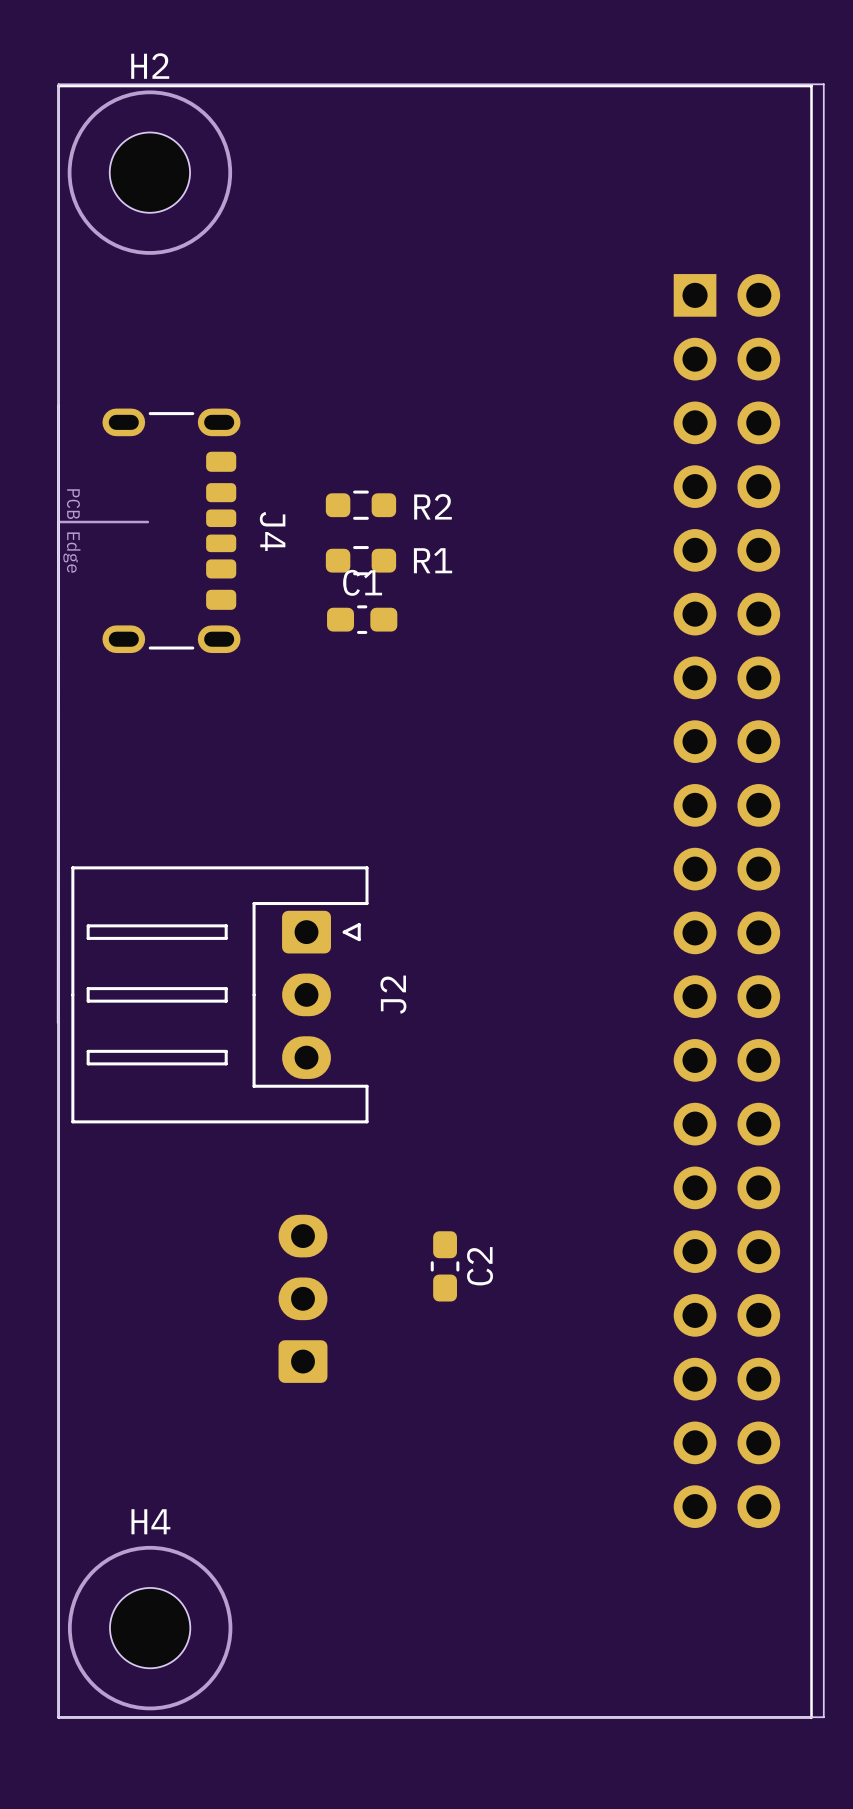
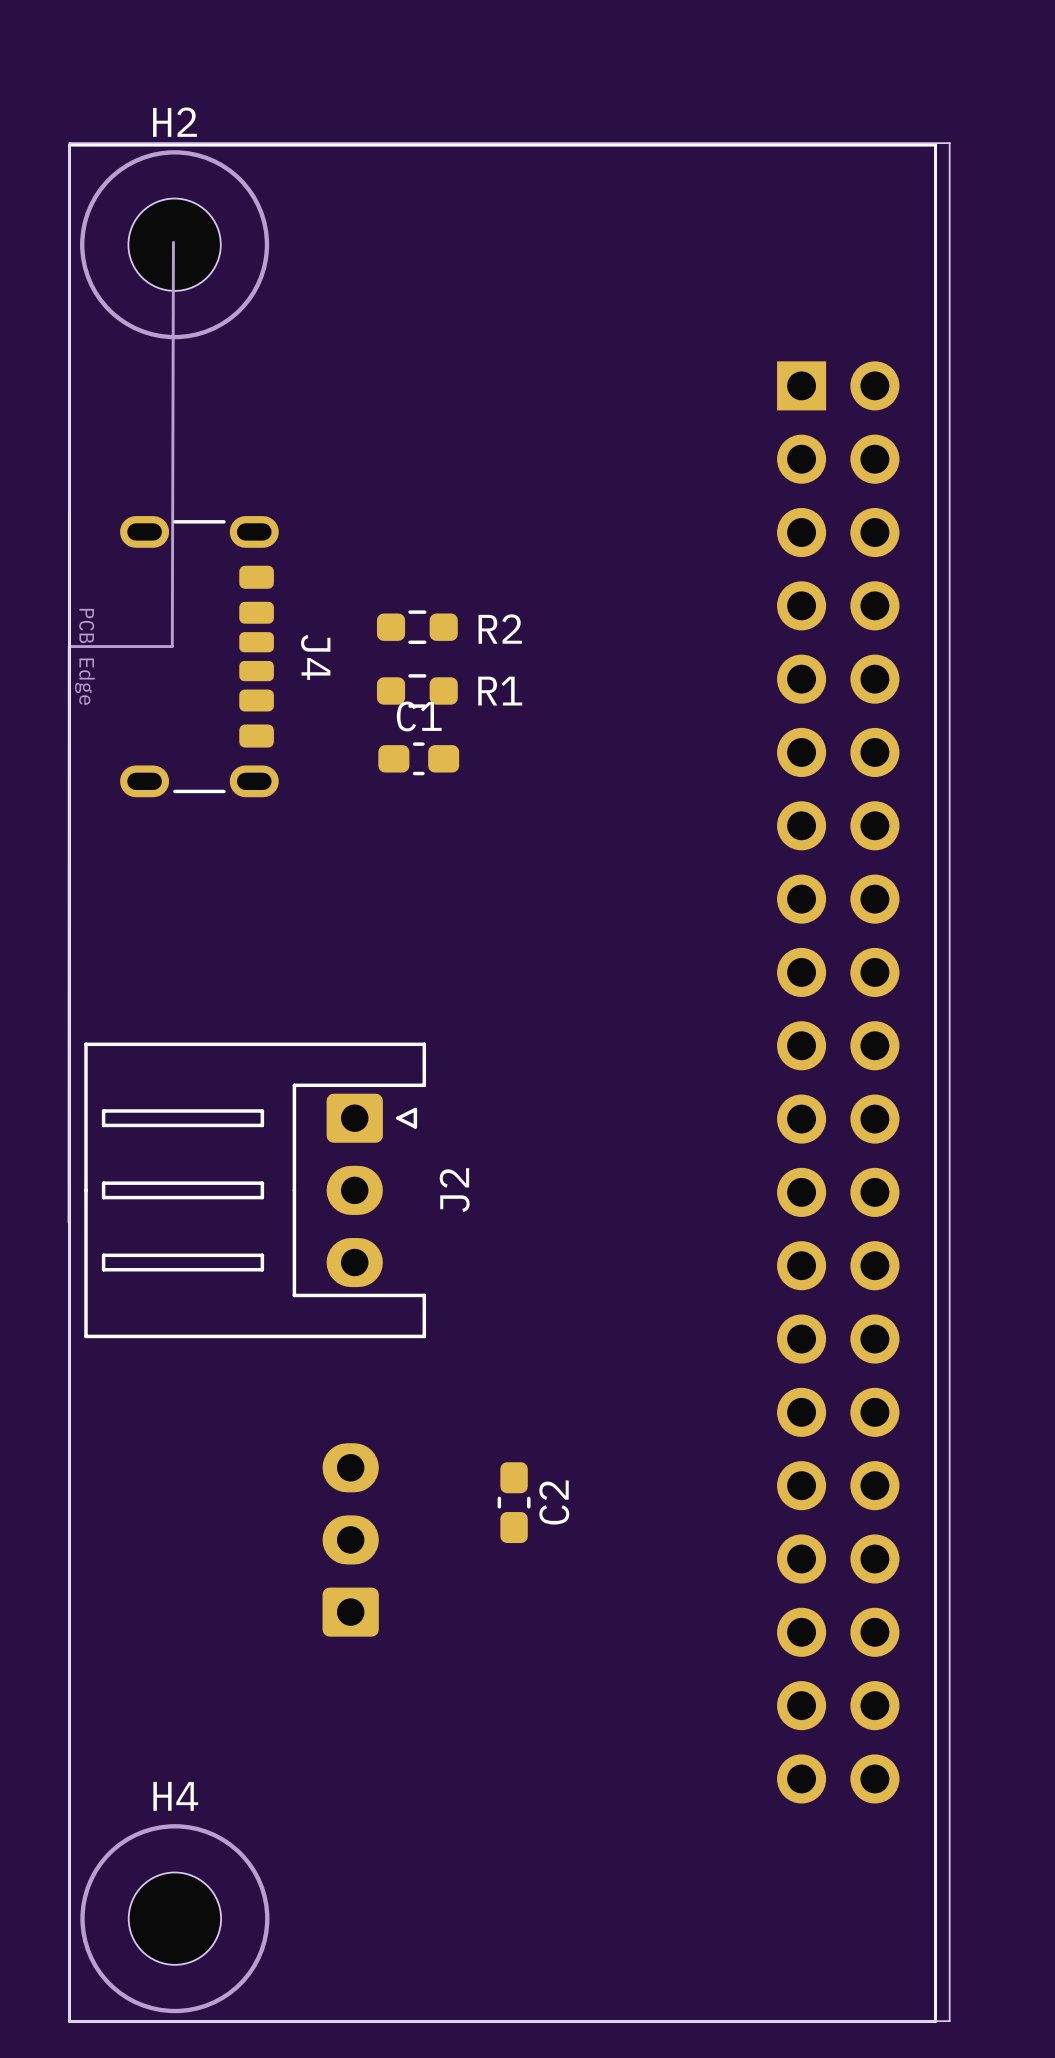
line: none -> (173, 242) (172, 646)

